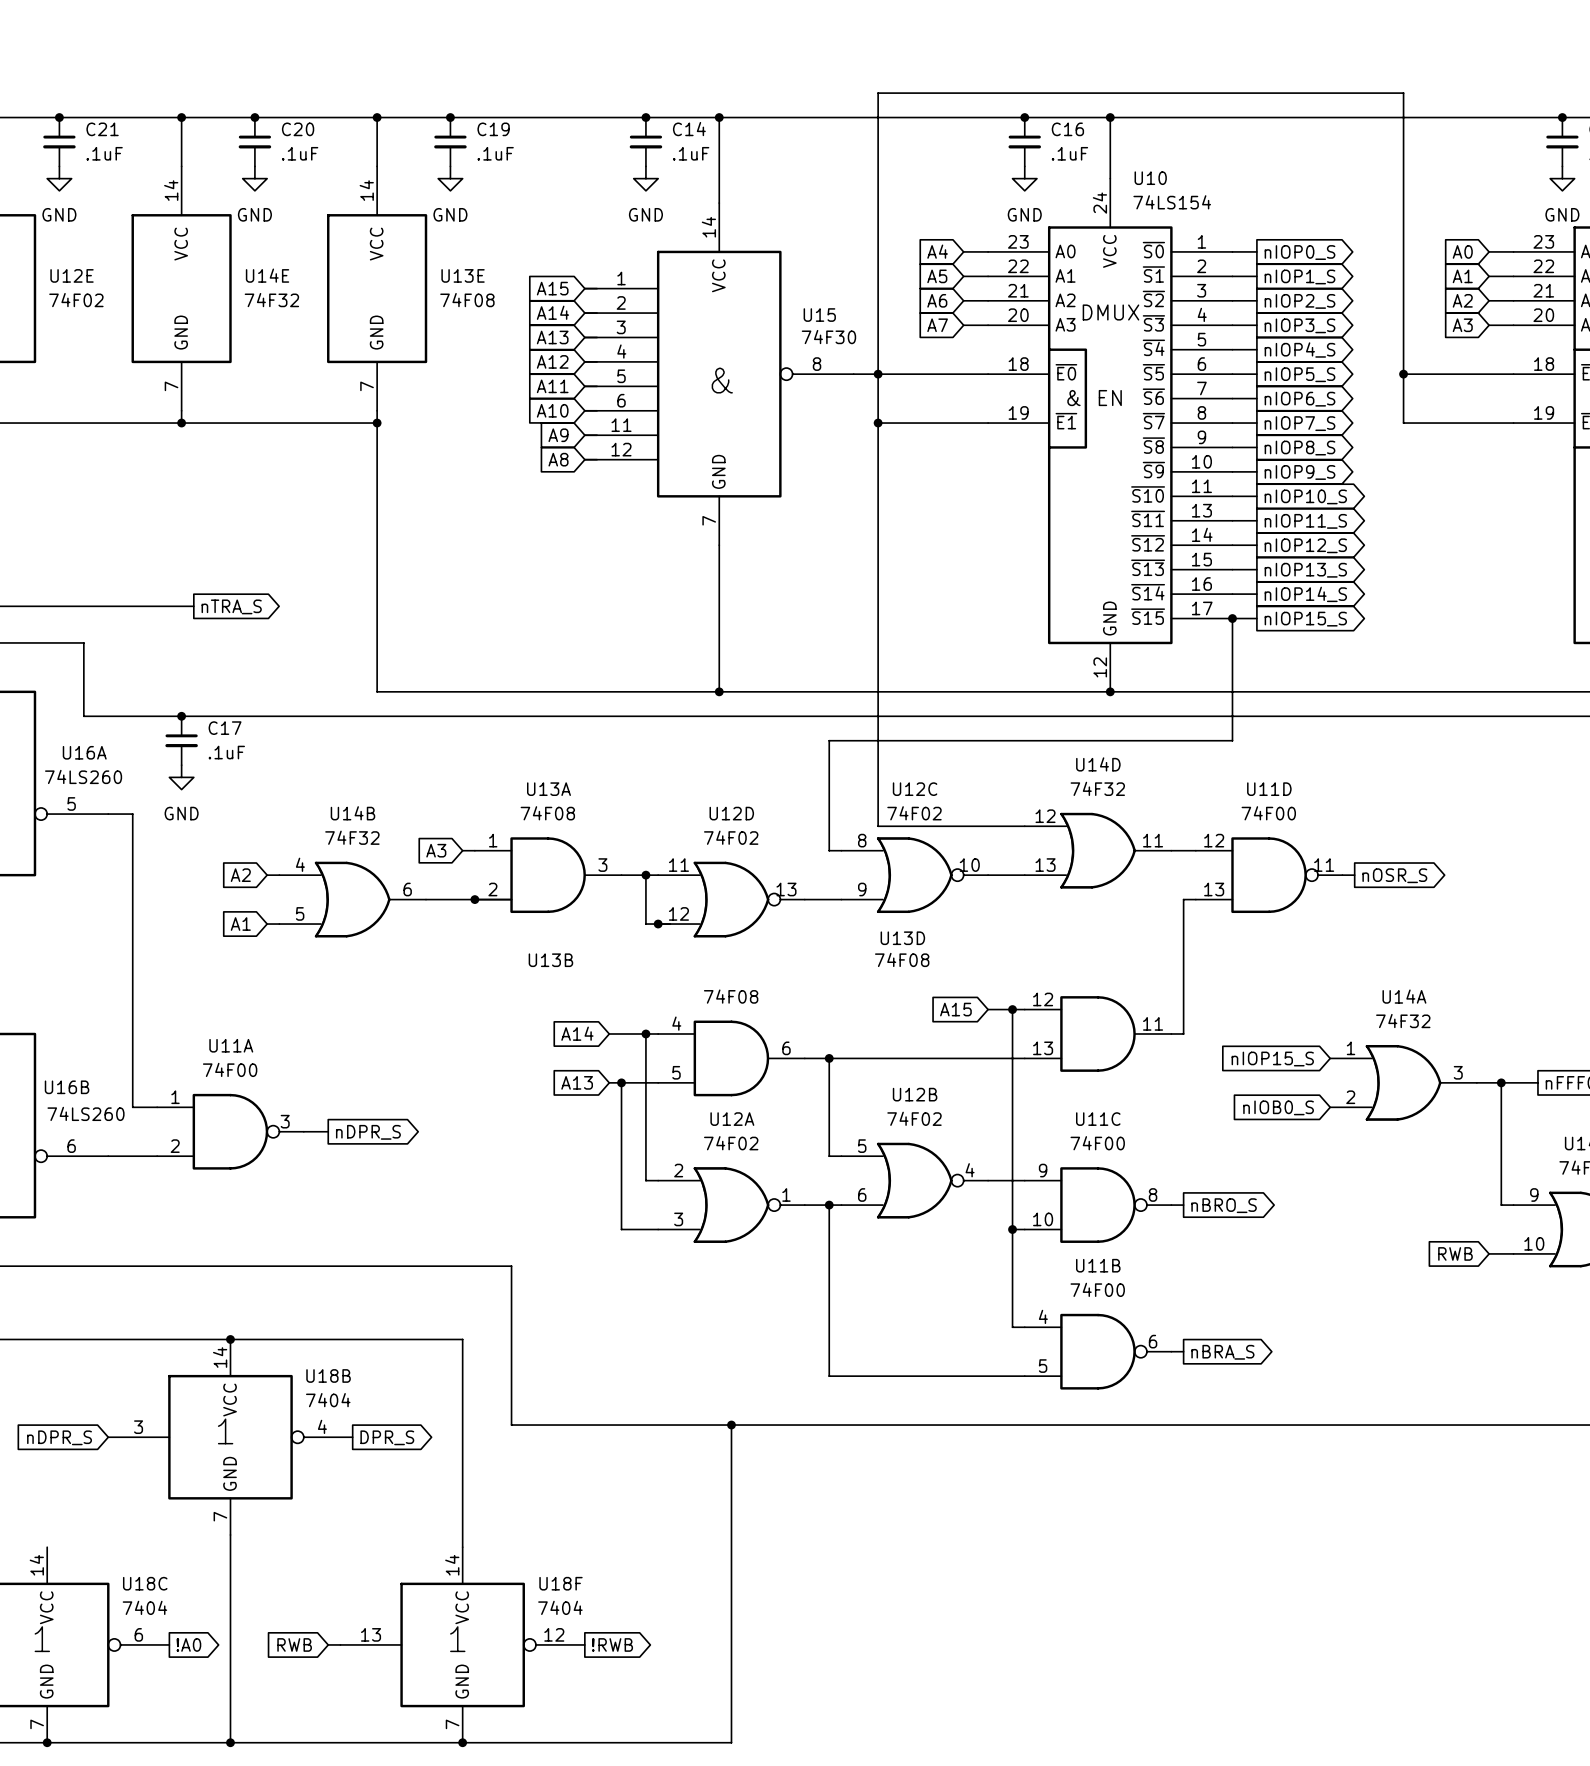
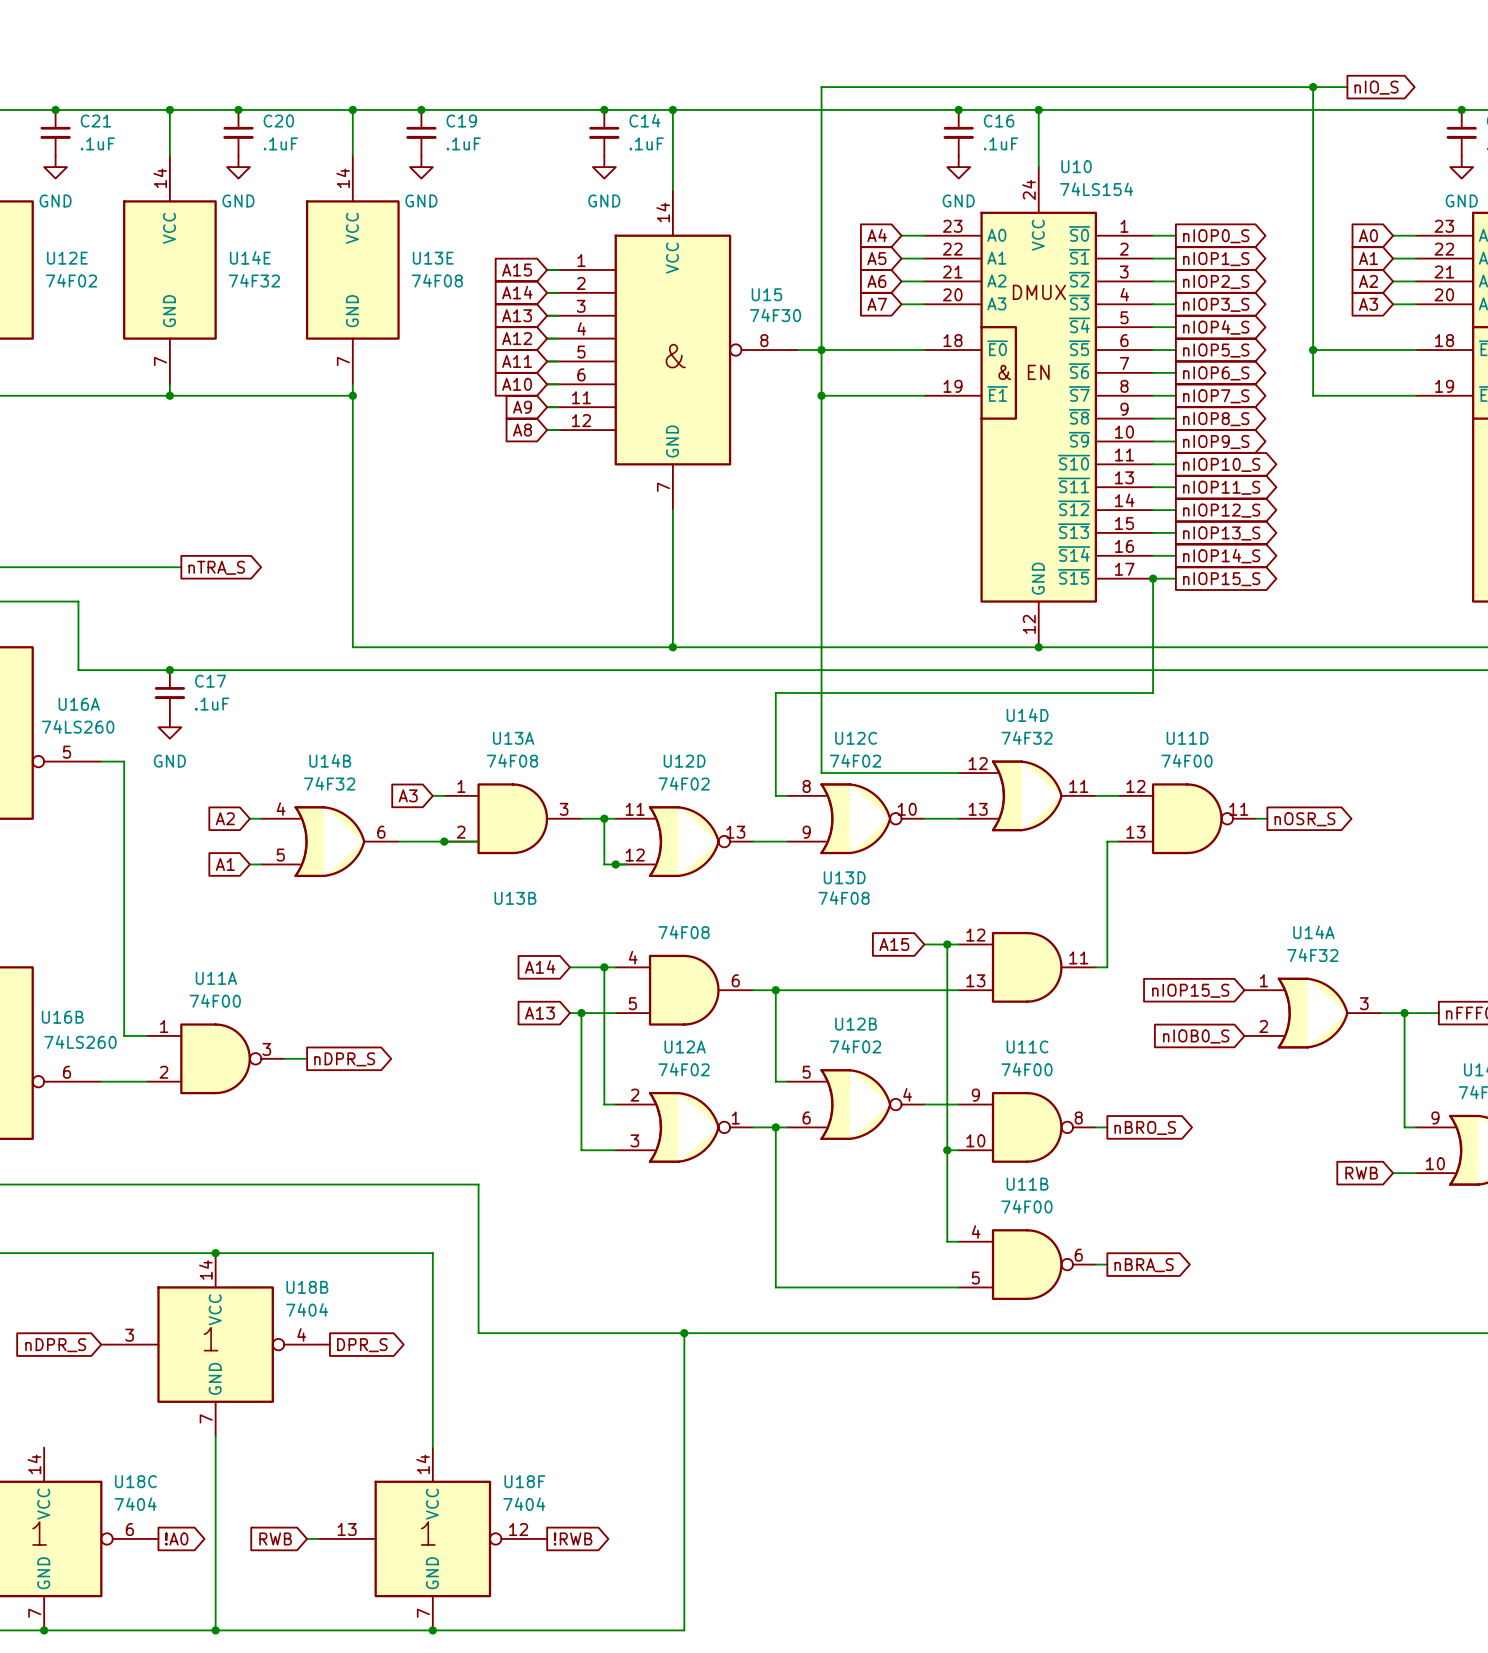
wire: none -> (1313, 87) (1347, 87)
junction: none -> (1313, 87)
global label: none -> nIO_S (1376, 87)

